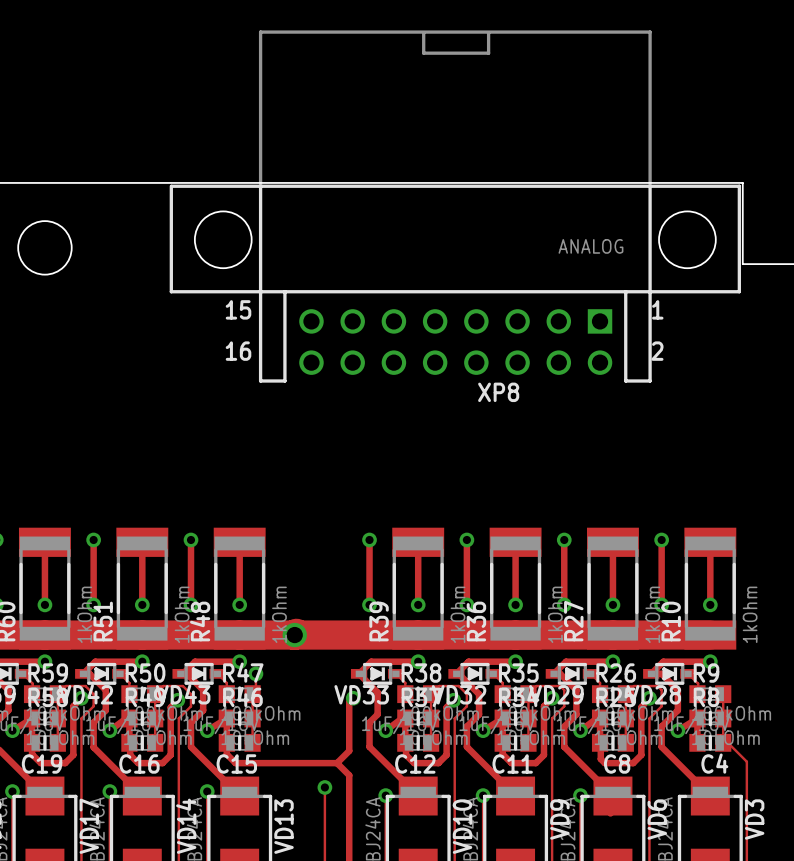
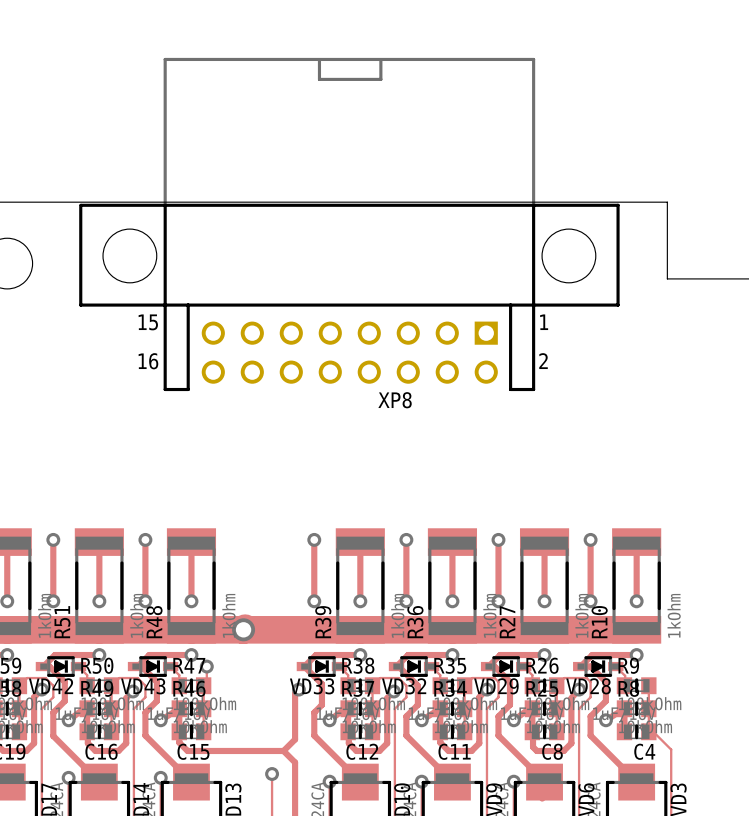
XP8 position: (455, 206) -> (349, 224)
XP8 value: ANALOG (590, 246) -> none

